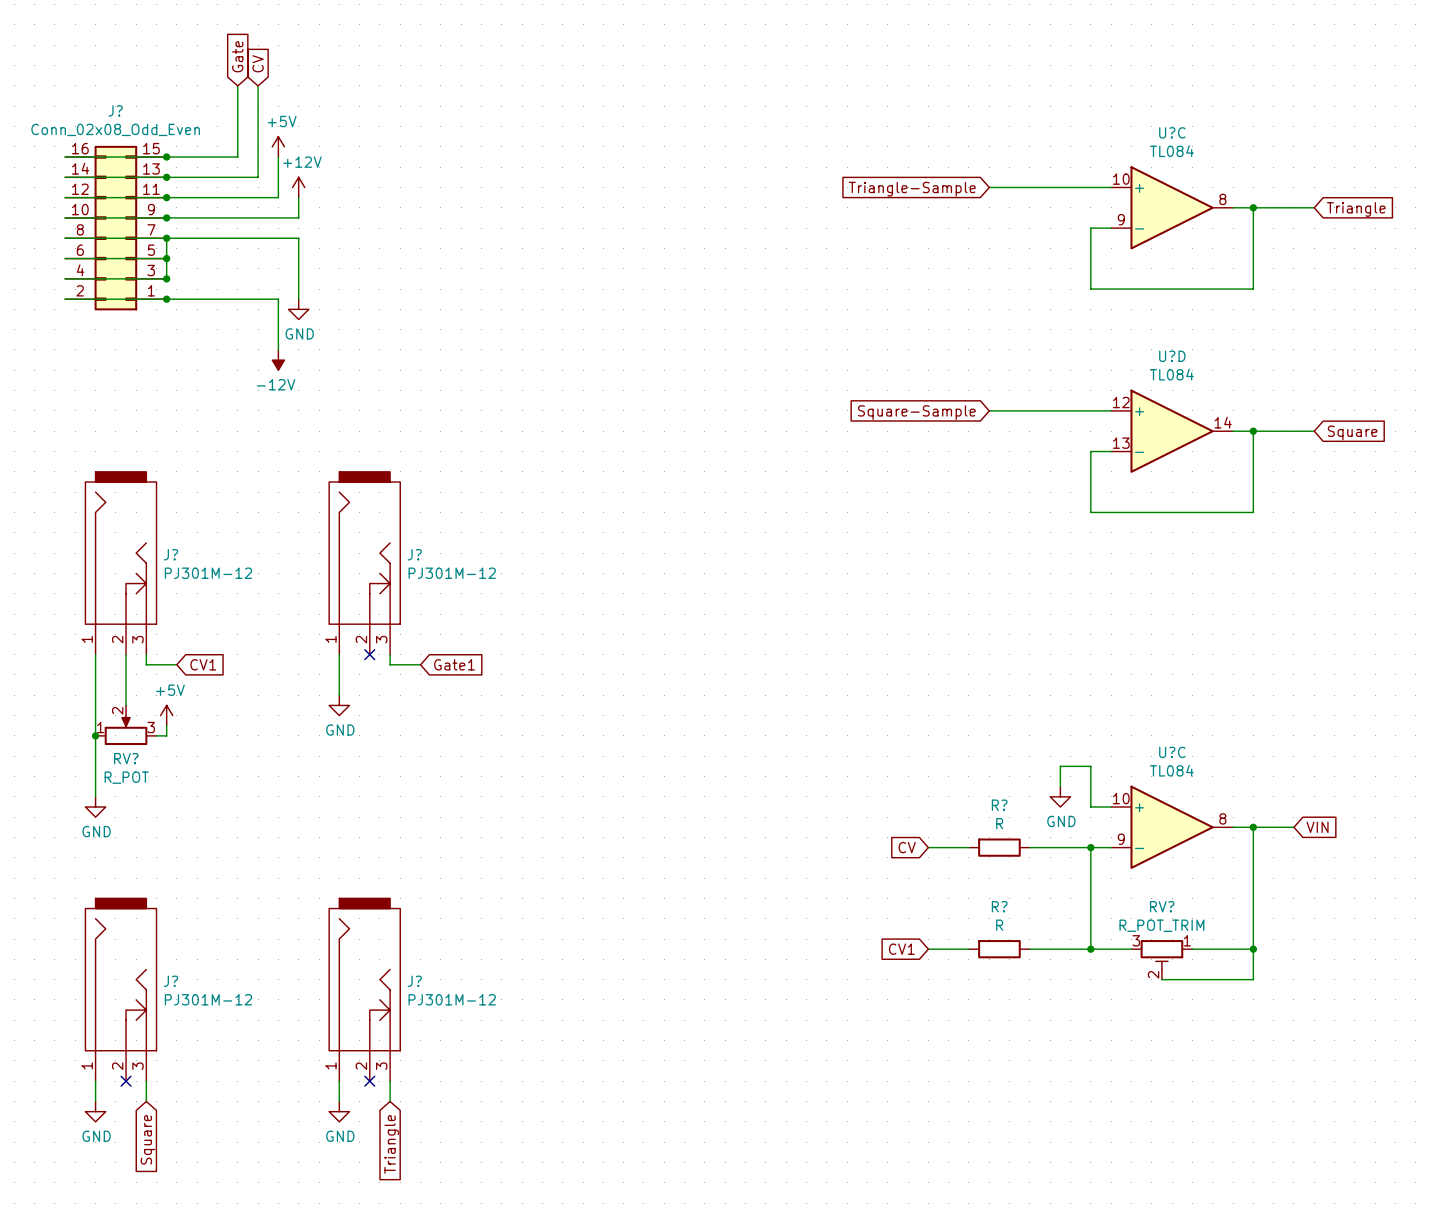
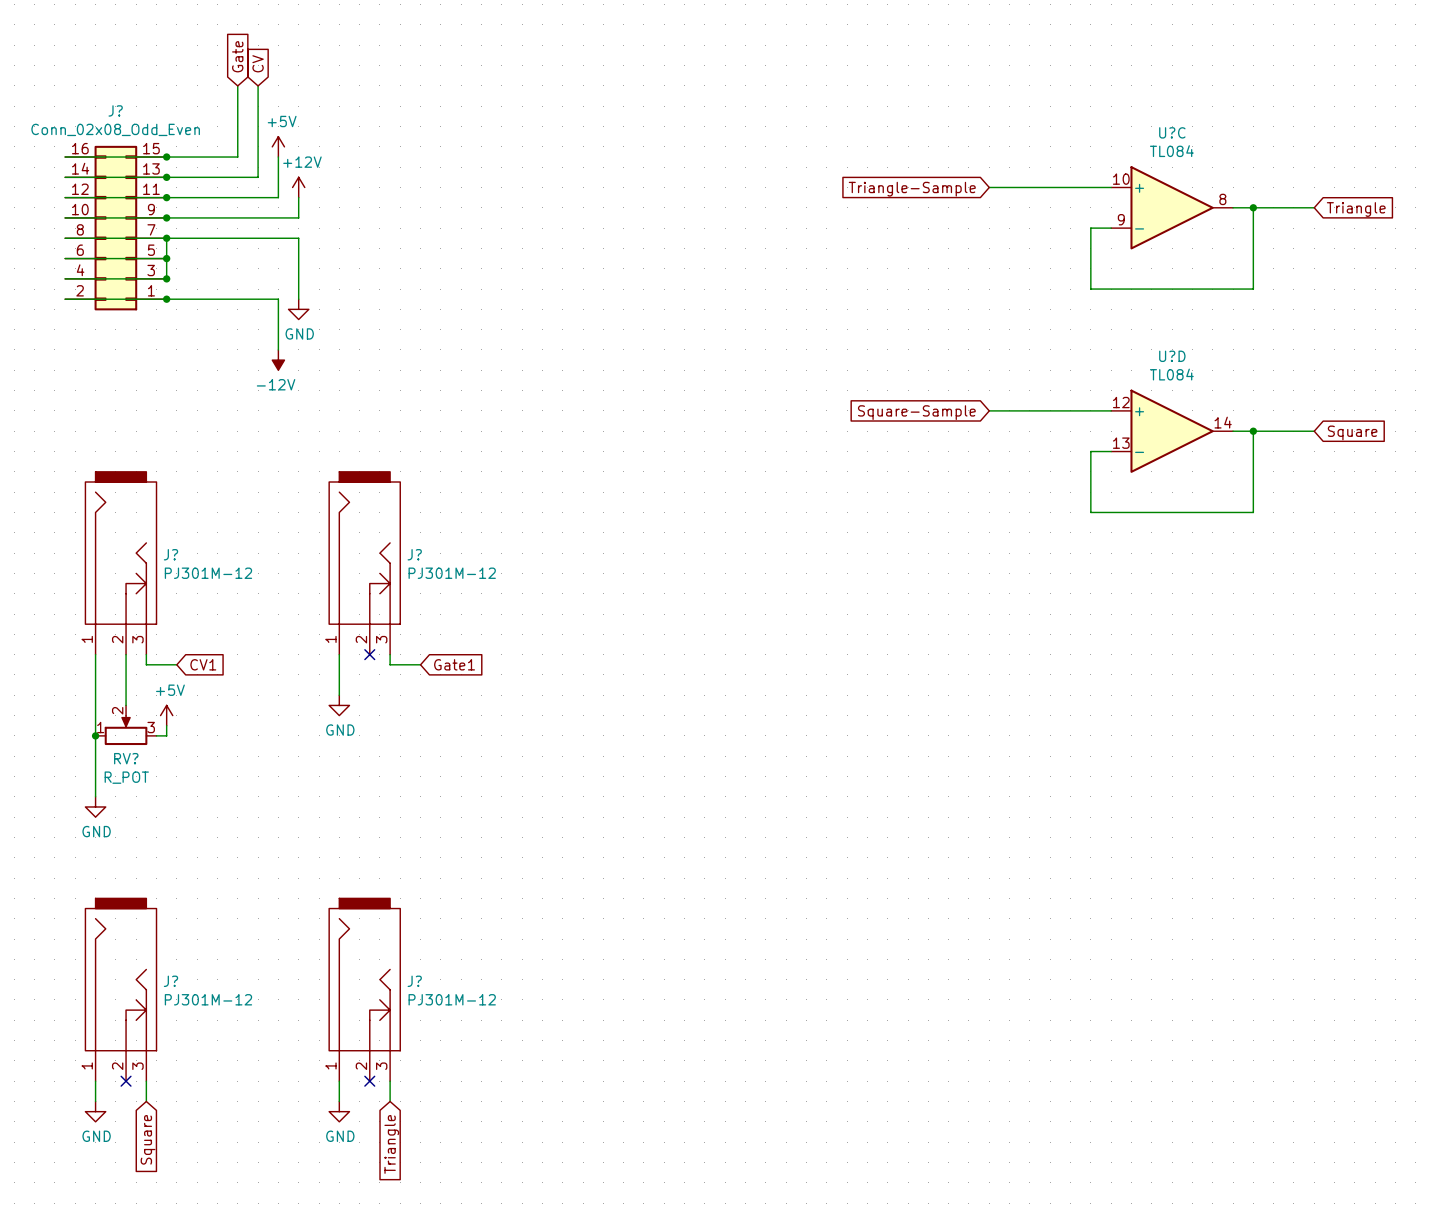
wire: (1060, 786) (1060, 766) (1090, 766) (1090, 806) (1111, 806) -> none
power symbol: GND (1060, 796) -> none
U?C: TL084 (1172, 827) -> none
wire: (1233, 827) (1293, 827) -> none
wire: (1253, 827) (1253, 979) (1161, 979) -> none
junction: (1253, 827) -> none
global label: VIN (1317, 827) -> none
global label: CV (907, 847) -> none
wire: (928, 847) (968, 847) -> none
R?: R (999, 847) -> none
wire: (1029, 847) (1111, 847) -> none
wire: (1090, 847) (1090, 949) -> none
junction: (1090, 847) -> none
global label: CV1 (901, 949) -> none
wire: (928, 949) (968, 949) -> none
R?: R (999, 949) -> none
wire: (1029, 949) (1131, 949) -> none
junction: (1090, 949) -> none
wire: (1192, 949) (1253, 949) -> none
junction: (1253, 949) -> none
RV?: R_POT_TRIM (1161, 959) -> none

